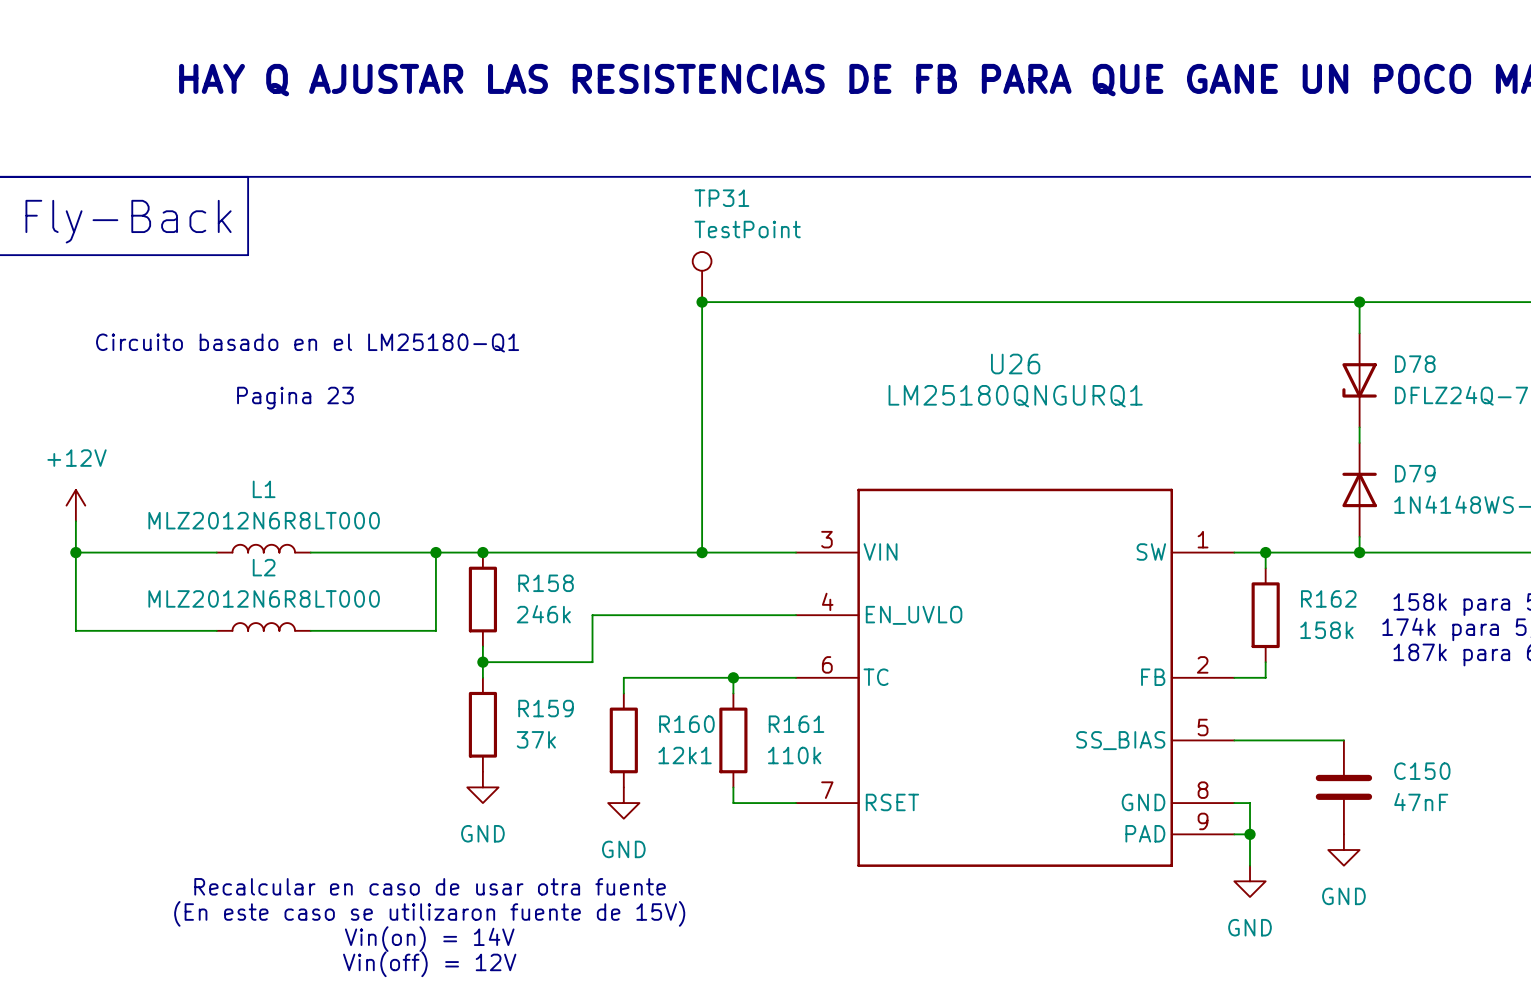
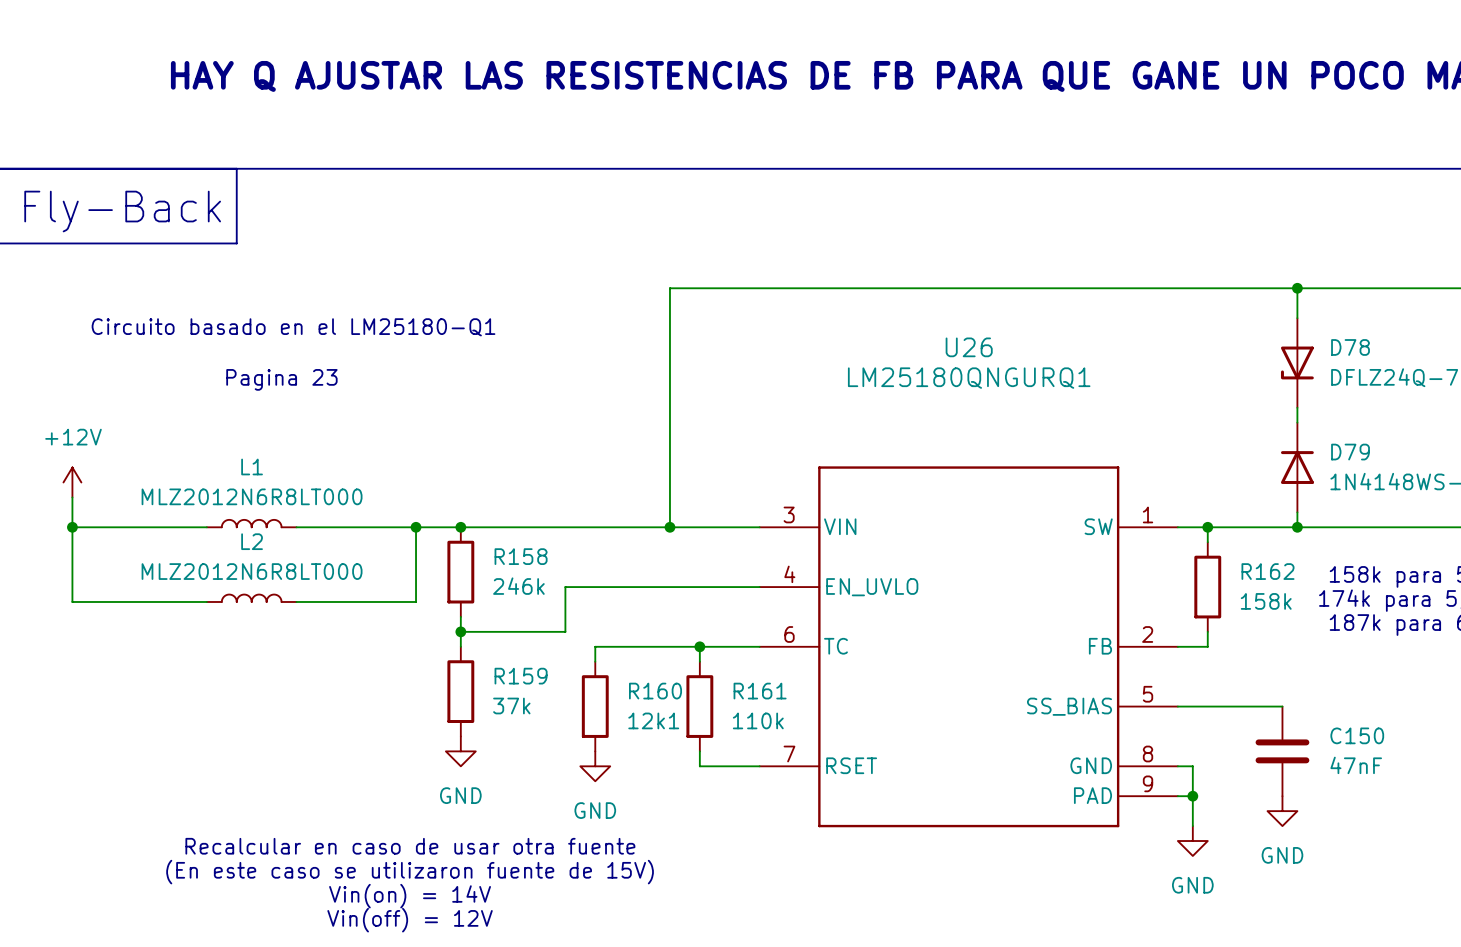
TP31: TestPoint (702, 277) -> none
junction: (702, 302) -> none

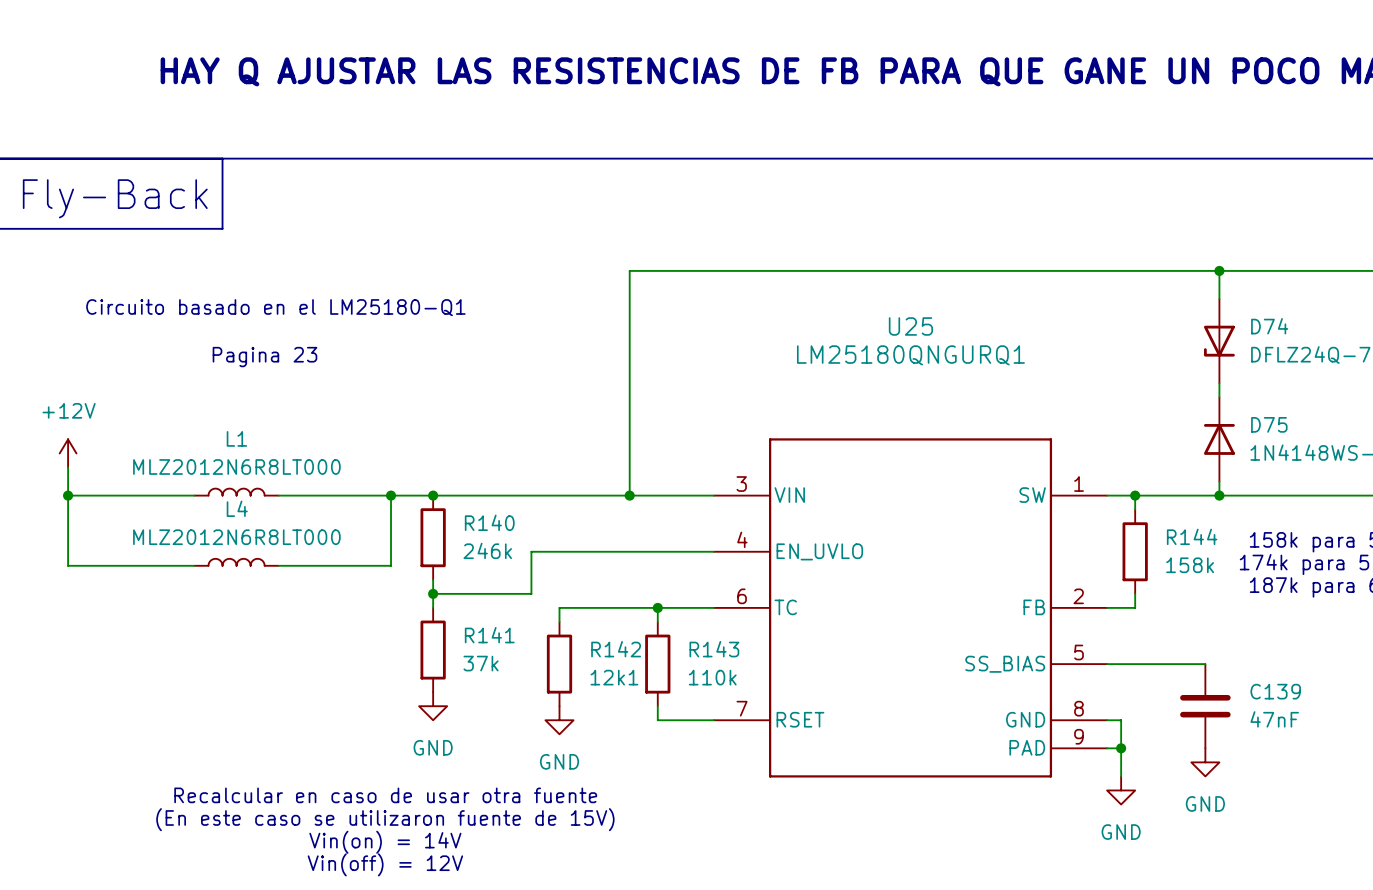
U26 name: U26 (969, 347) -> U25 (910, 326)
D78 name: D78 (1350, 347) -> D74 (1269, 326)
D79 name: D79 (1350, 452) -> D75 (1269, 424)
L2 name: L2 (252, 541) -> L4 (237, 508)
R158 name: R158 (521, 556) -> R140 (489, 522)
R162 name: R162 (1267, 571) -> R144 (1192, 536)
R159 name: R159 (521, 676) -> R141 (489, 635)
R160 name: R160 (655, 691) -> R142 (616, 649)
R161 name: R161 (760, 691) -> R143 (714, 649)
C150 name: C150 (1357, 735) -> C139 (1275, 691)

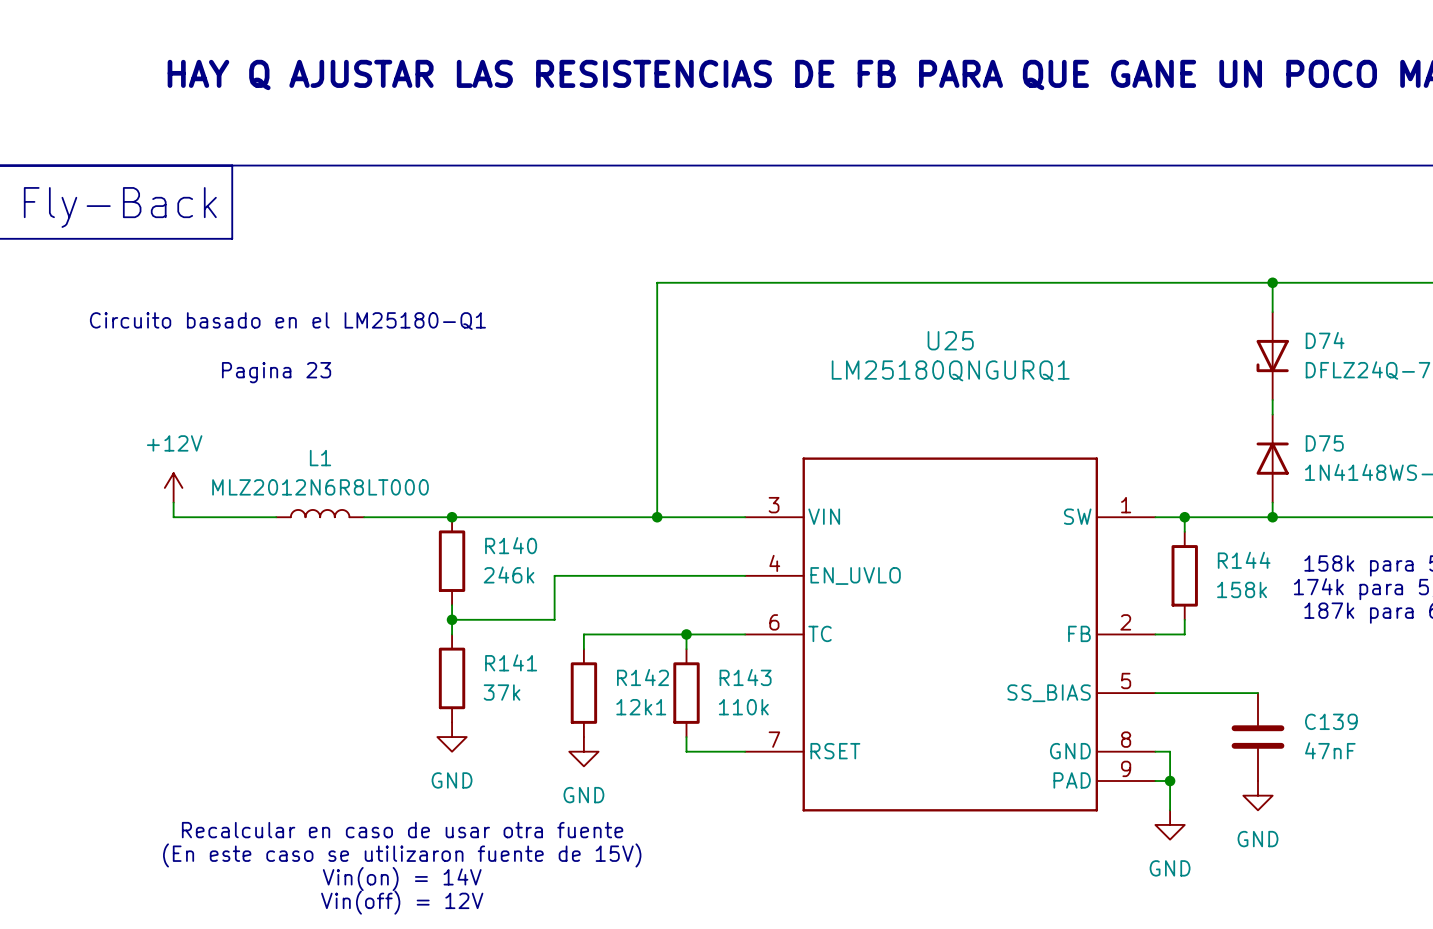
power symbol position: +12V (68, 453) -> +12V (173, 487)
wire: (68, 467) (68, 565) (194, 565) -> none
L1 position: (236, 492) -> (320, 513)
wire: (68, 495) (166, 495) -> (173, 502) (173, 517)
junction: (68, 495) -> none
wire: (278, 495) (348, 495) -> (202, 517) (276, 517)
wire: (391, 495) (391, 565) (278, 565) -> none
junction: (391, 495) -> none
L4: MLZ2012N6R8LT000 (236, 562) -> none

